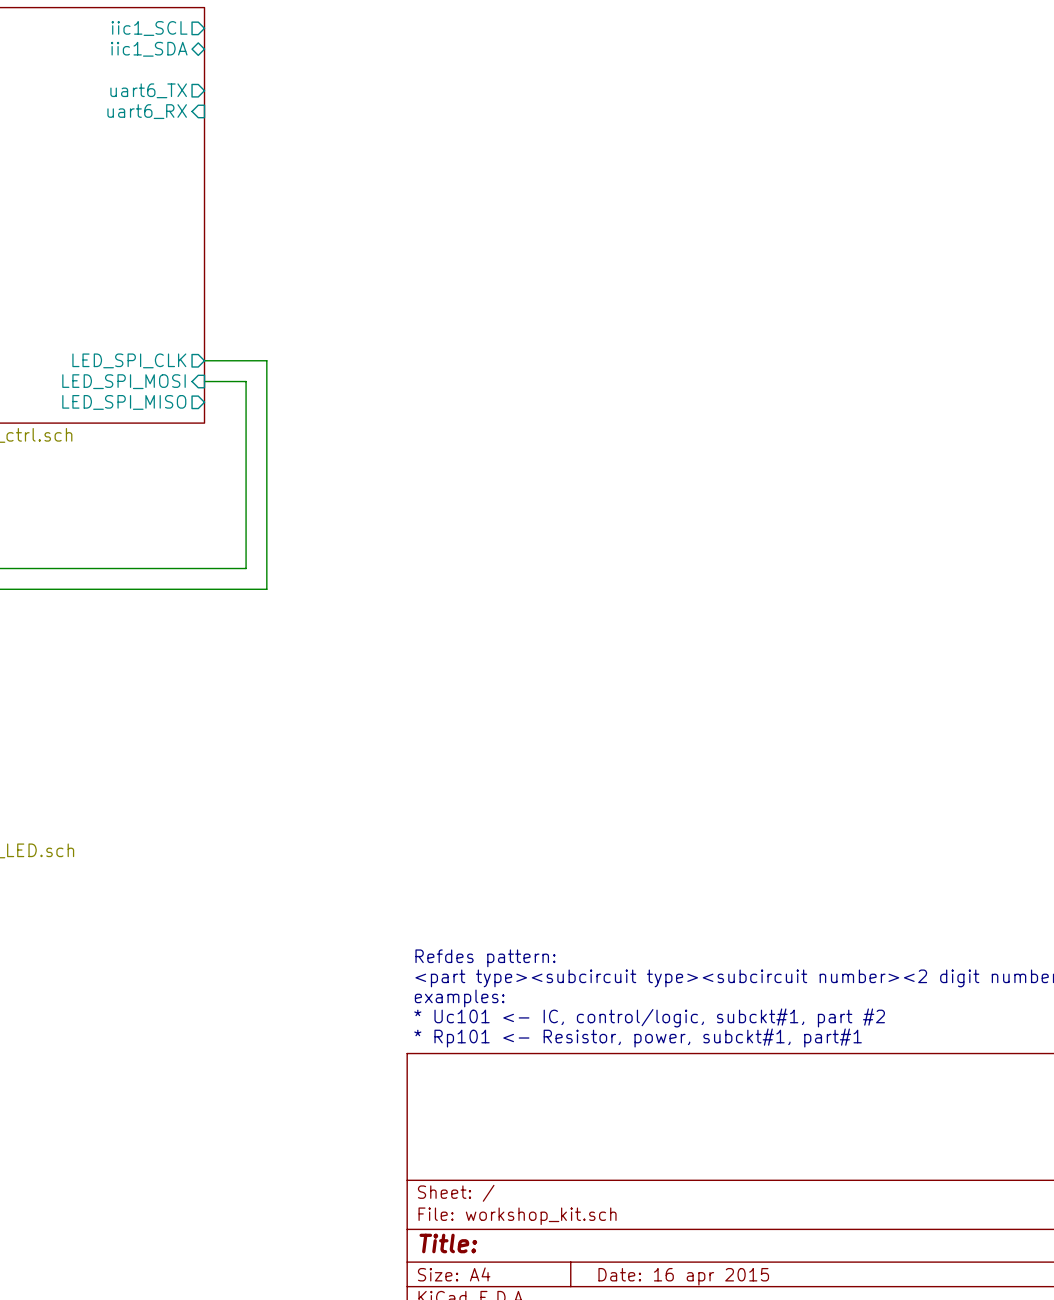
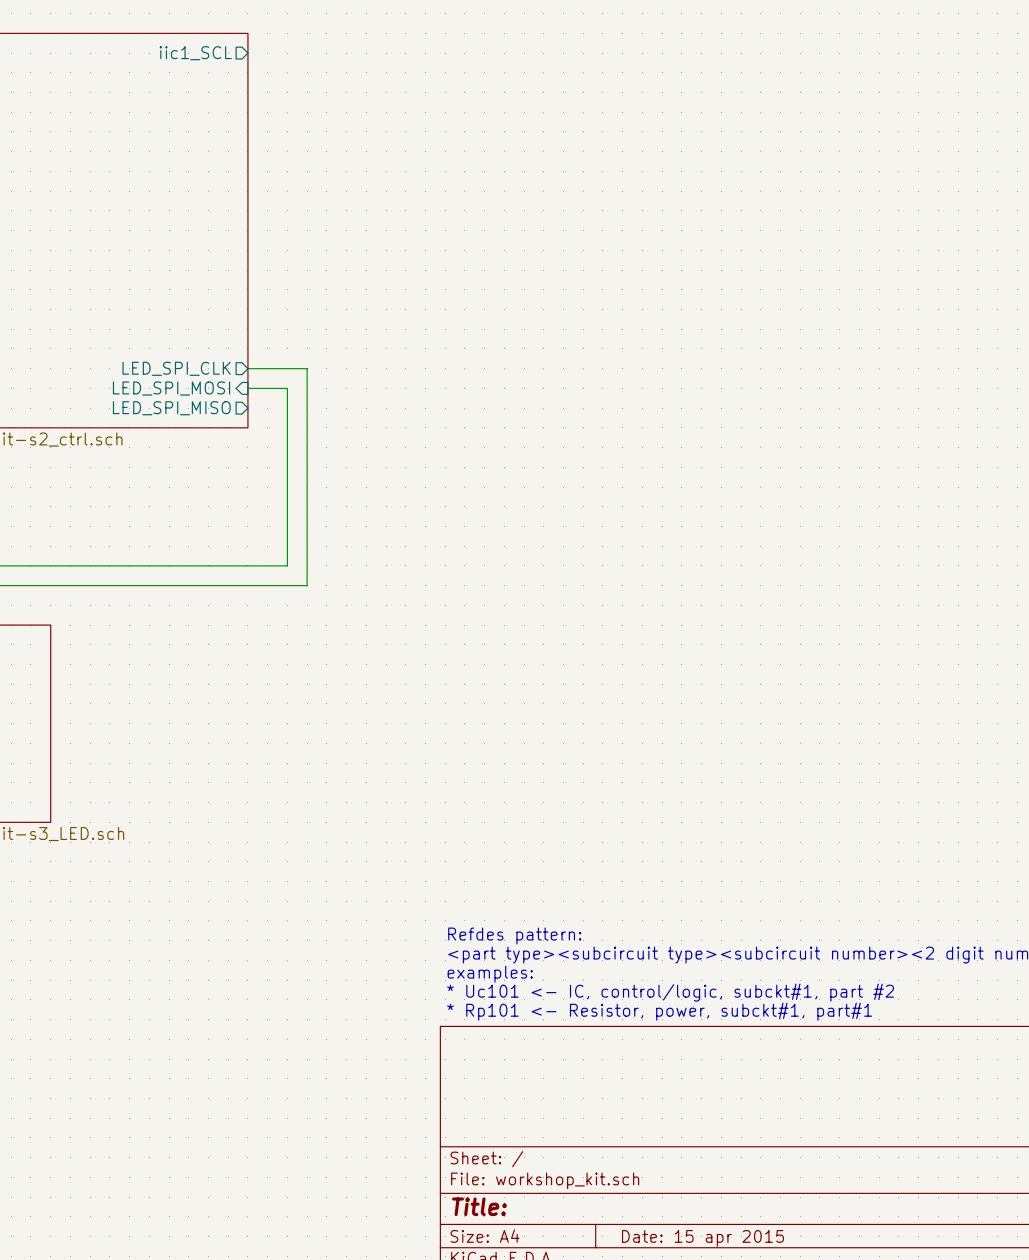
sheet pin: iic1_SDA (149, 49) -> none
sheet pin: uart6_TX (148, 90) -> none
sheet pin: uart6_RX (147, 111) -> none
title block: Date: 16 apr 2015 (683, 1276) -> Date: 15 apr 2015 (702, 1238)

